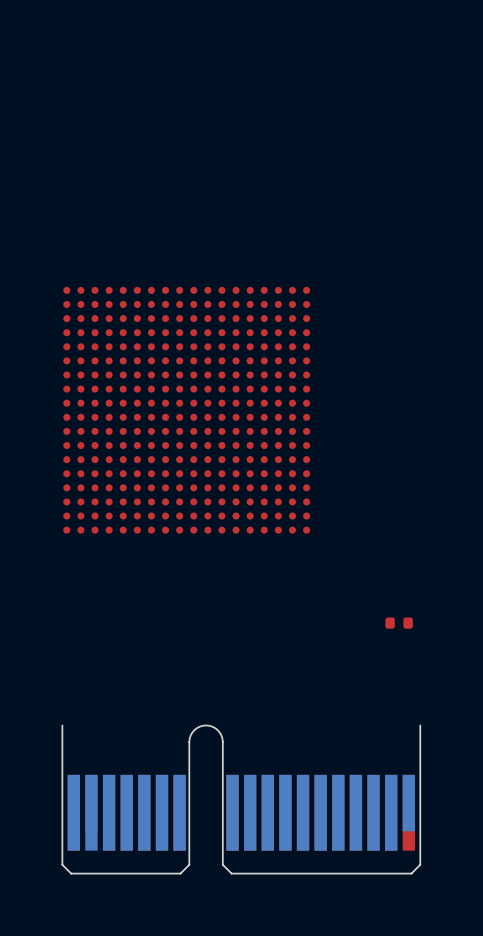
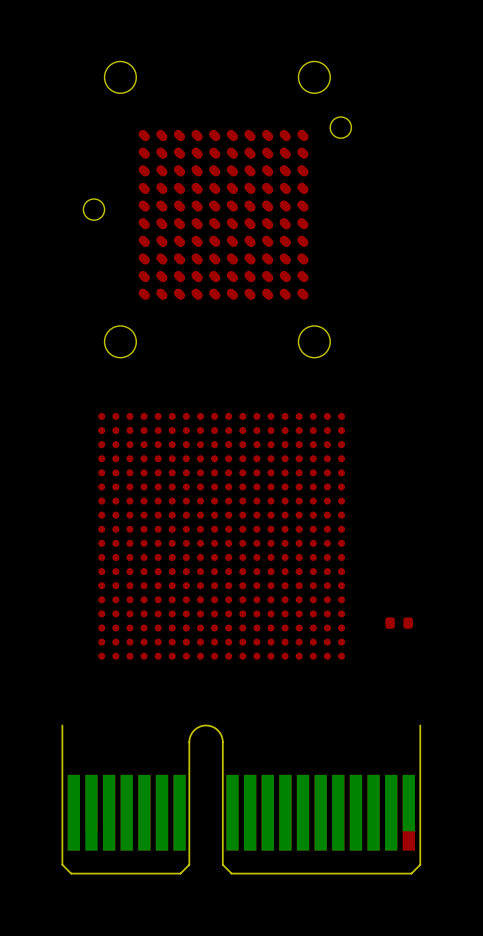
part: none -> (217, 209)
part position: (186, 410) -> (221, 536)

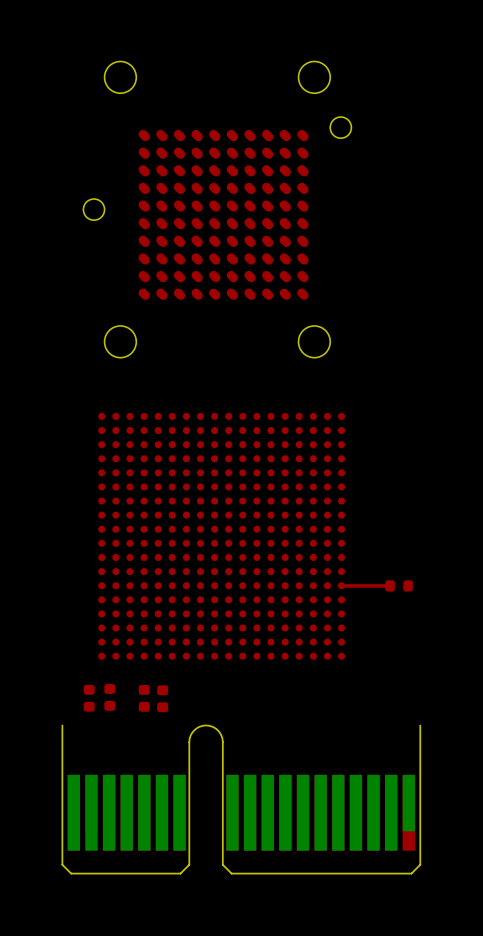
top track: none -> (390, 585) (341, 585)
part position: (399, 623) -> (399, 585)
part: none -> (109, 697)
part: none -> (89, 698)
part: none -> (144, 698)
part: none -> (162, 698)

